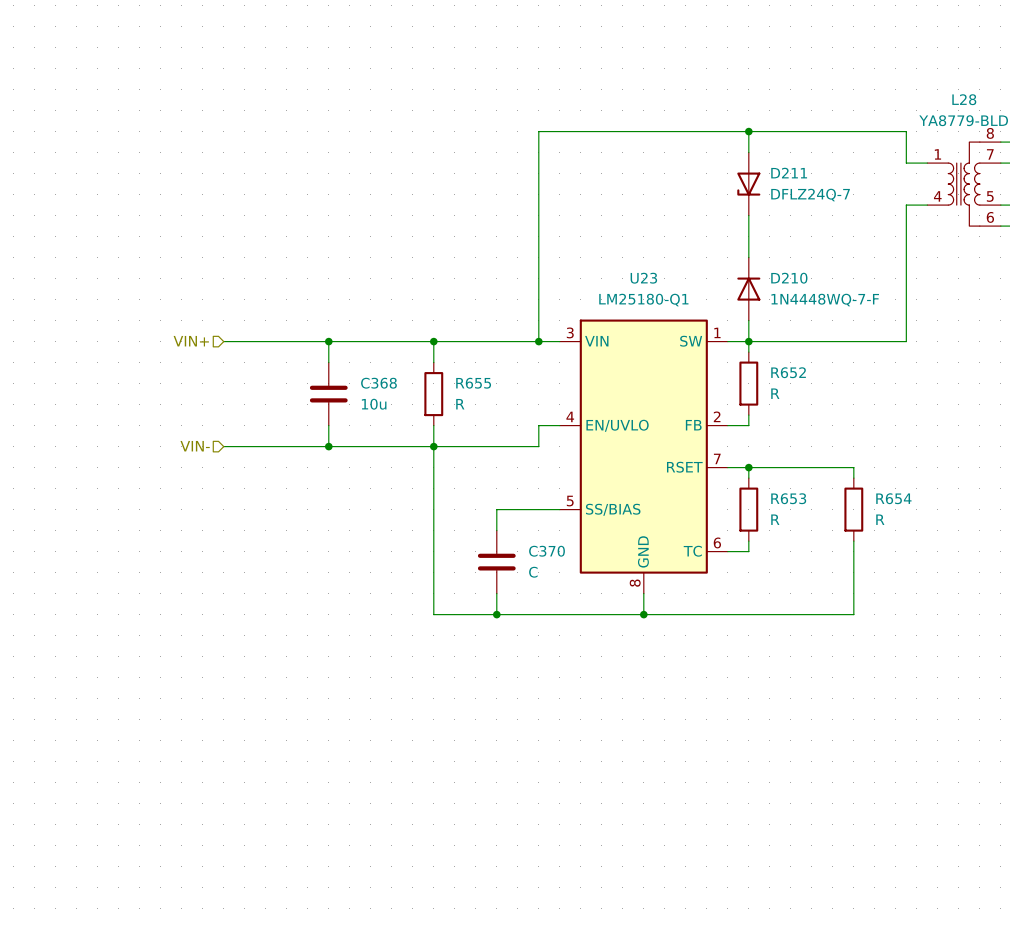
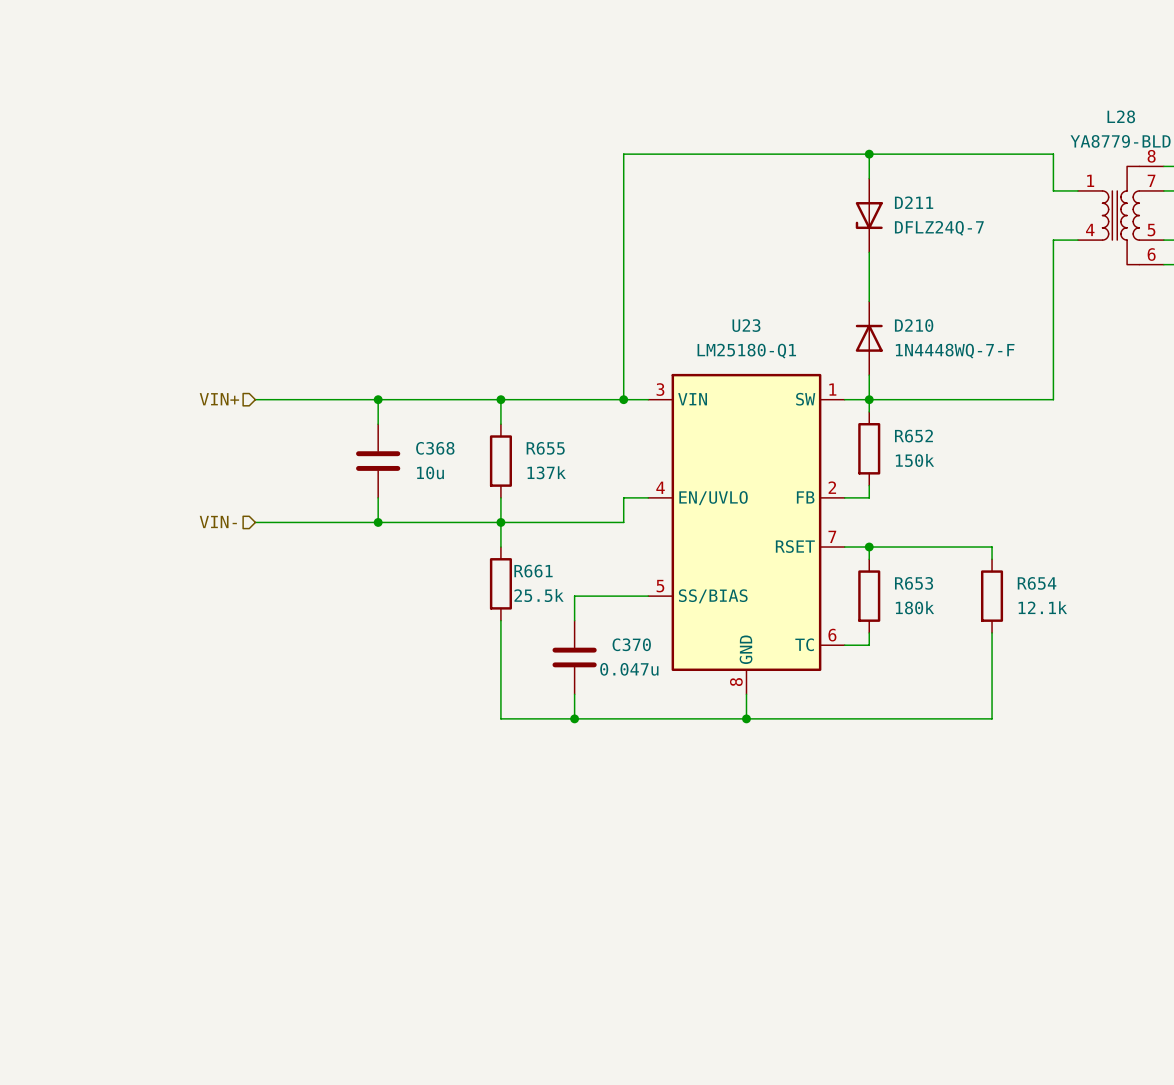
R652 value: R (775, 393) -> 150k (914, 460)
R655 value: R (460, 404) -> 137k (546, 472)
wire: (433, 467) (433, 530) -> none
R661: none -> 25.5k (500, 583)
R653 value: R (775, 519) -> 180k (914, 607)
R654 value: R (880, 519) -> 12.1k (1042, 607)
C370 value: C (533, 572) -> 0.047u (629, 669)

